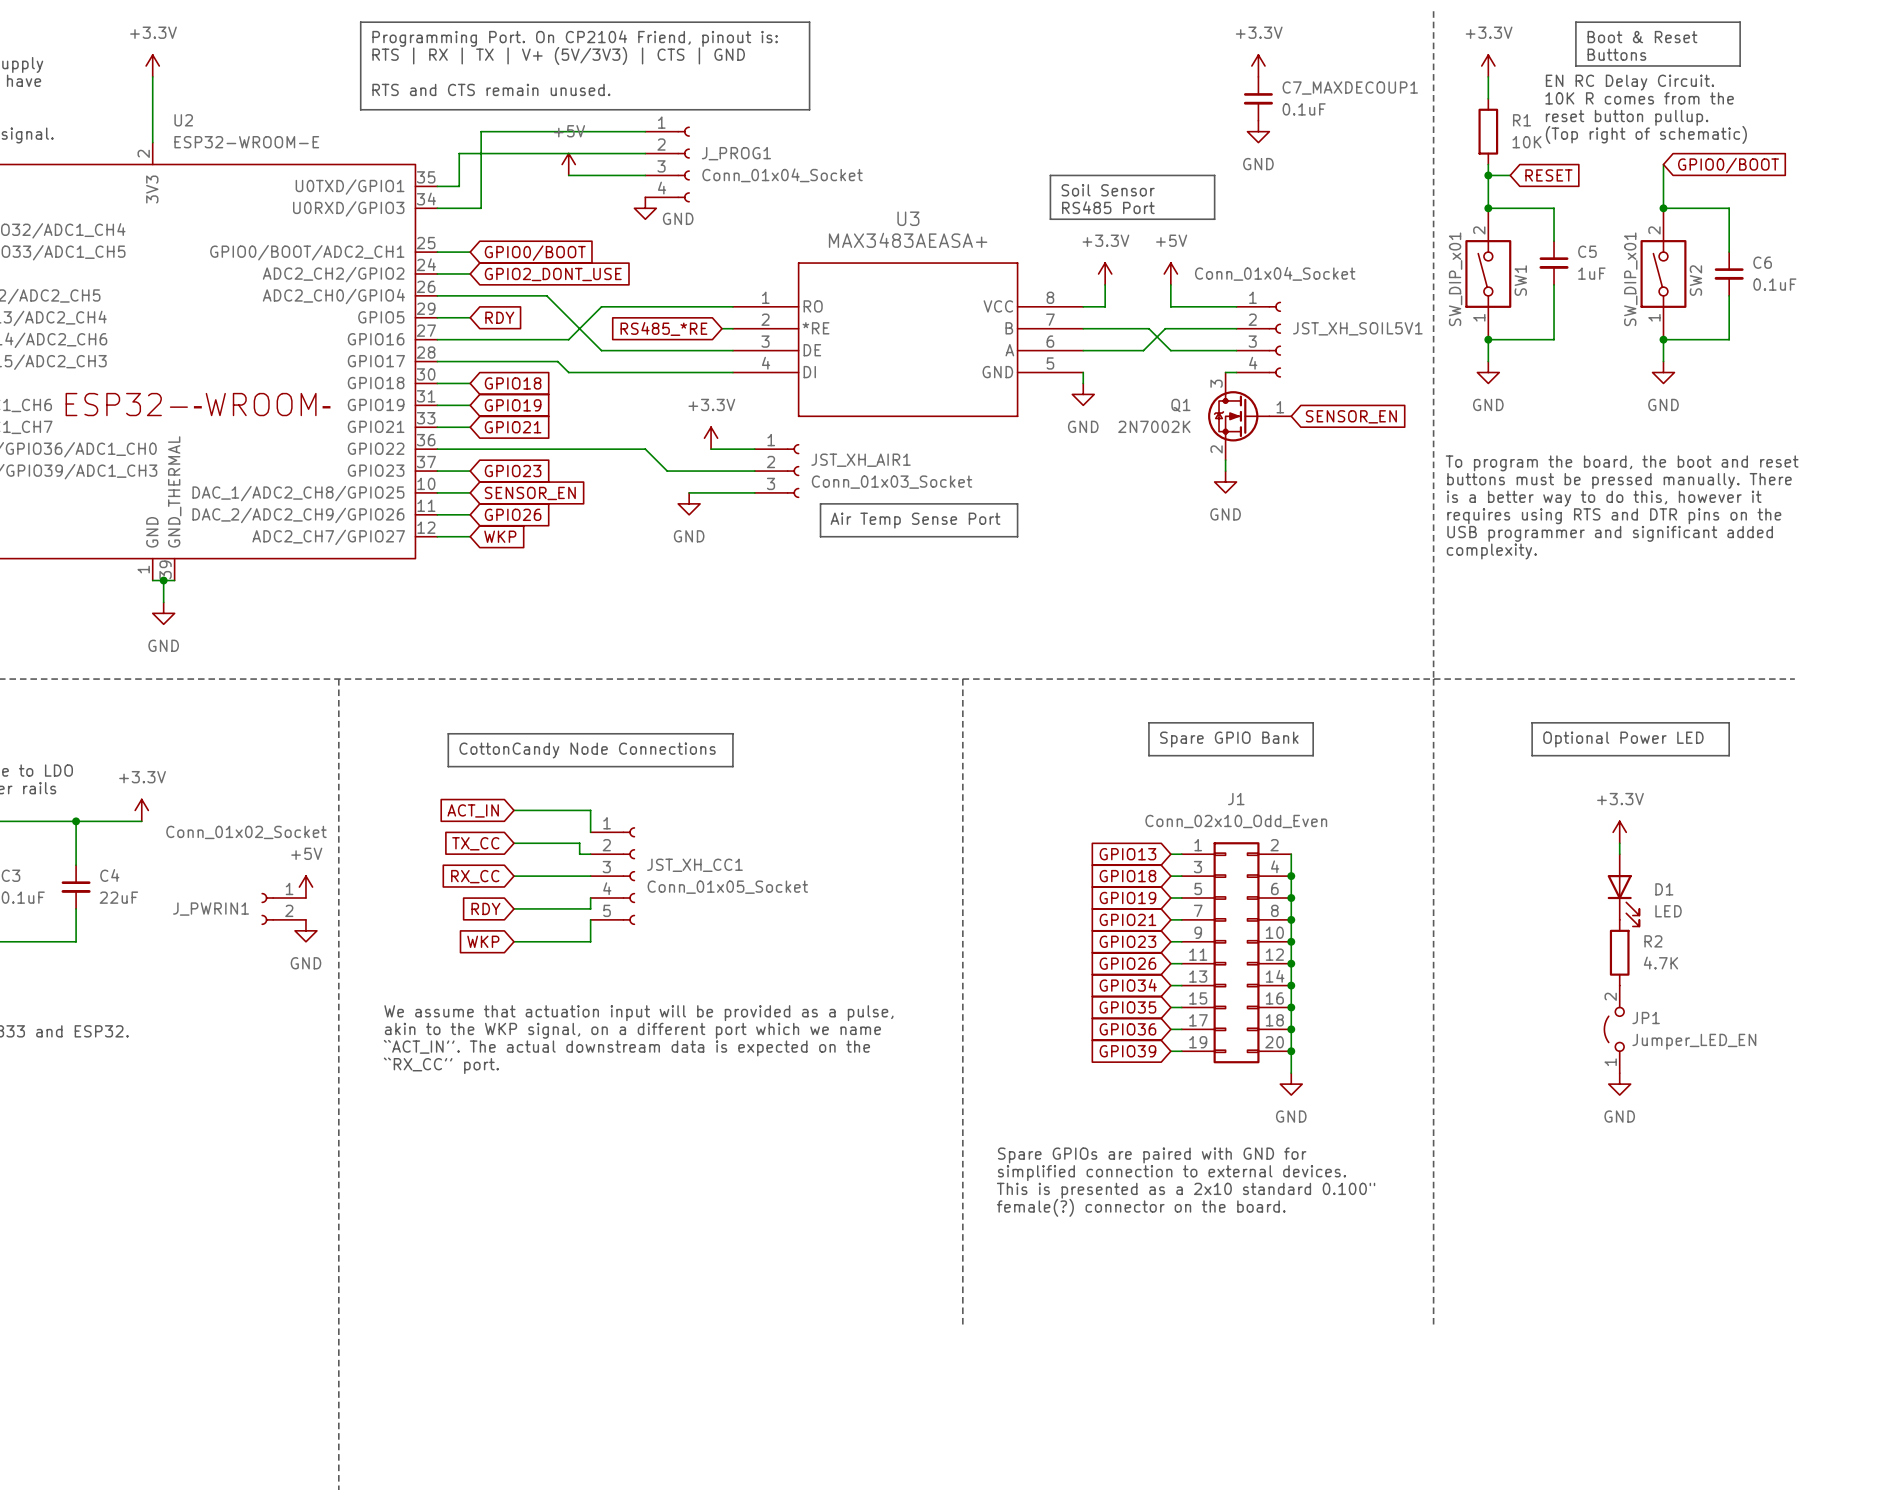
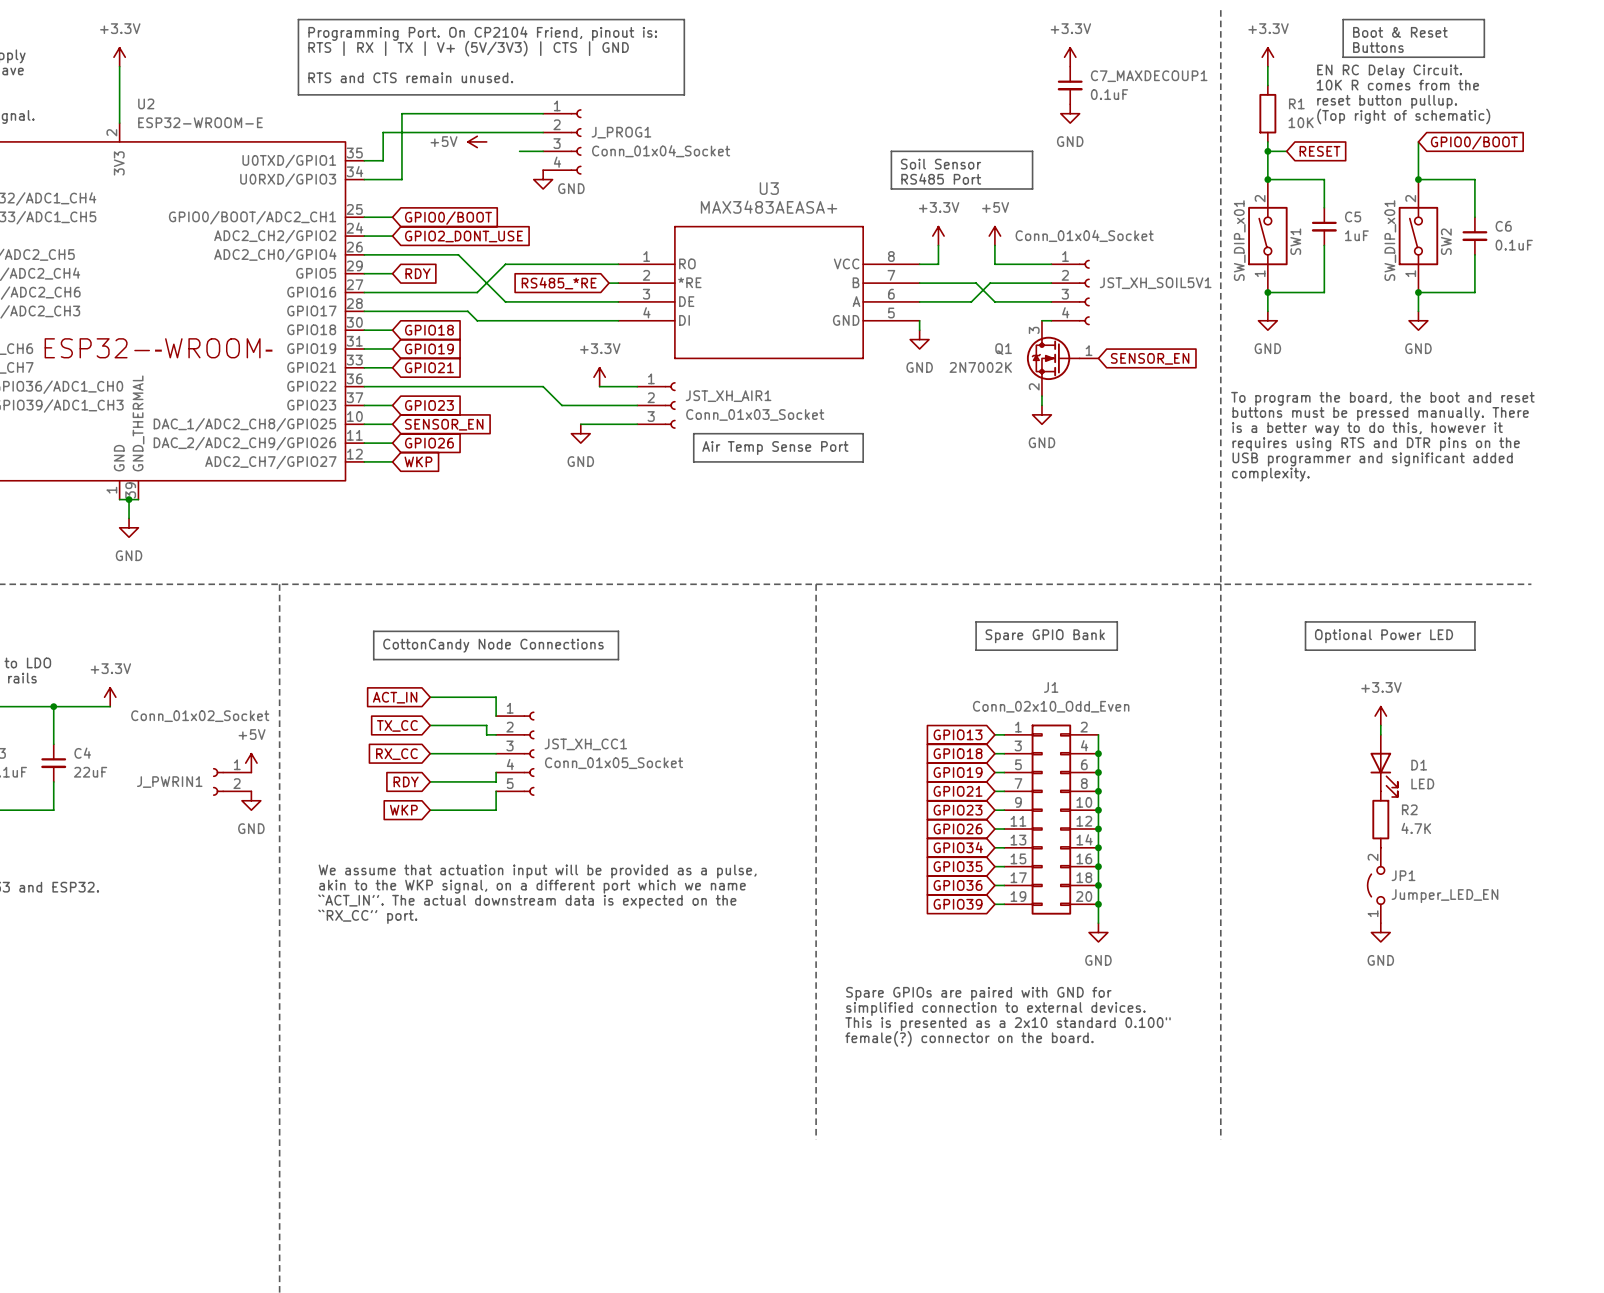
power symbol rotation: 0° (568, 164) -> 90° counterclockwise (477, 141)
wire: (568, 175) (617, 175) -> none

